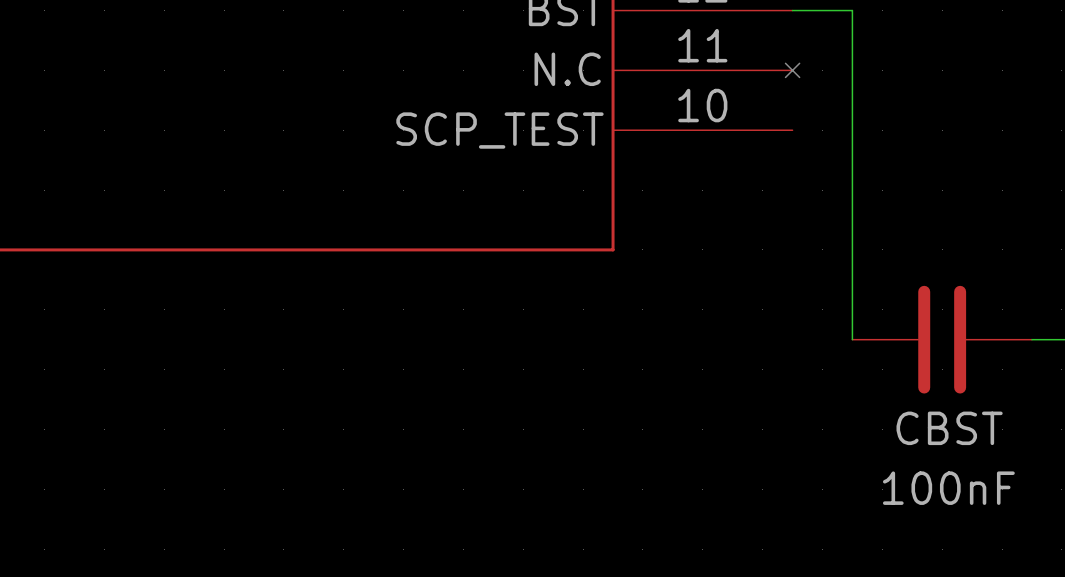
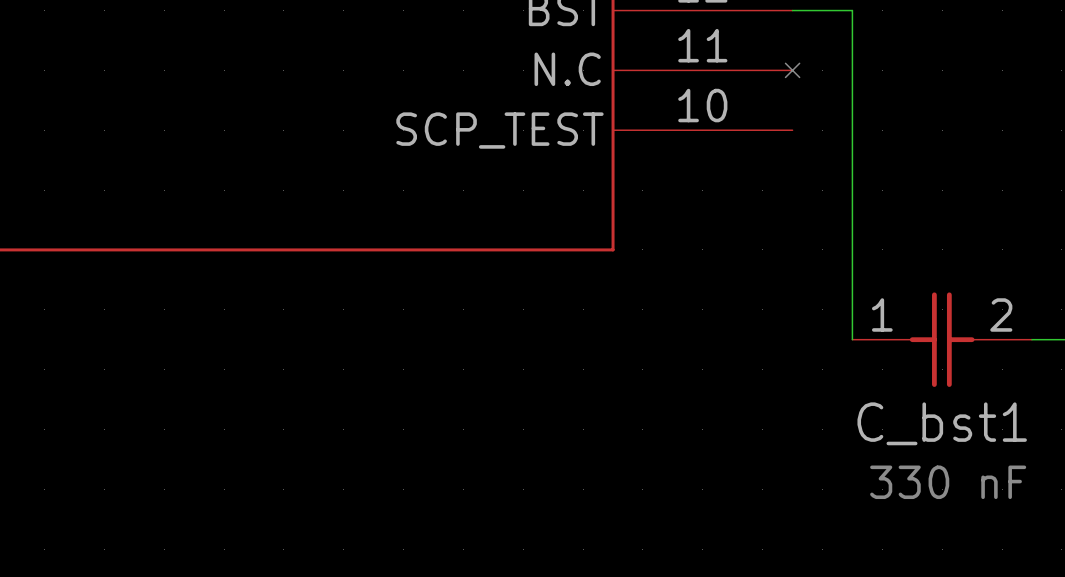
CBST: 100nF (942, 339) -> none
C_bst1: none -> (942, 339)
text: none -> 330 nF (948, 482)

